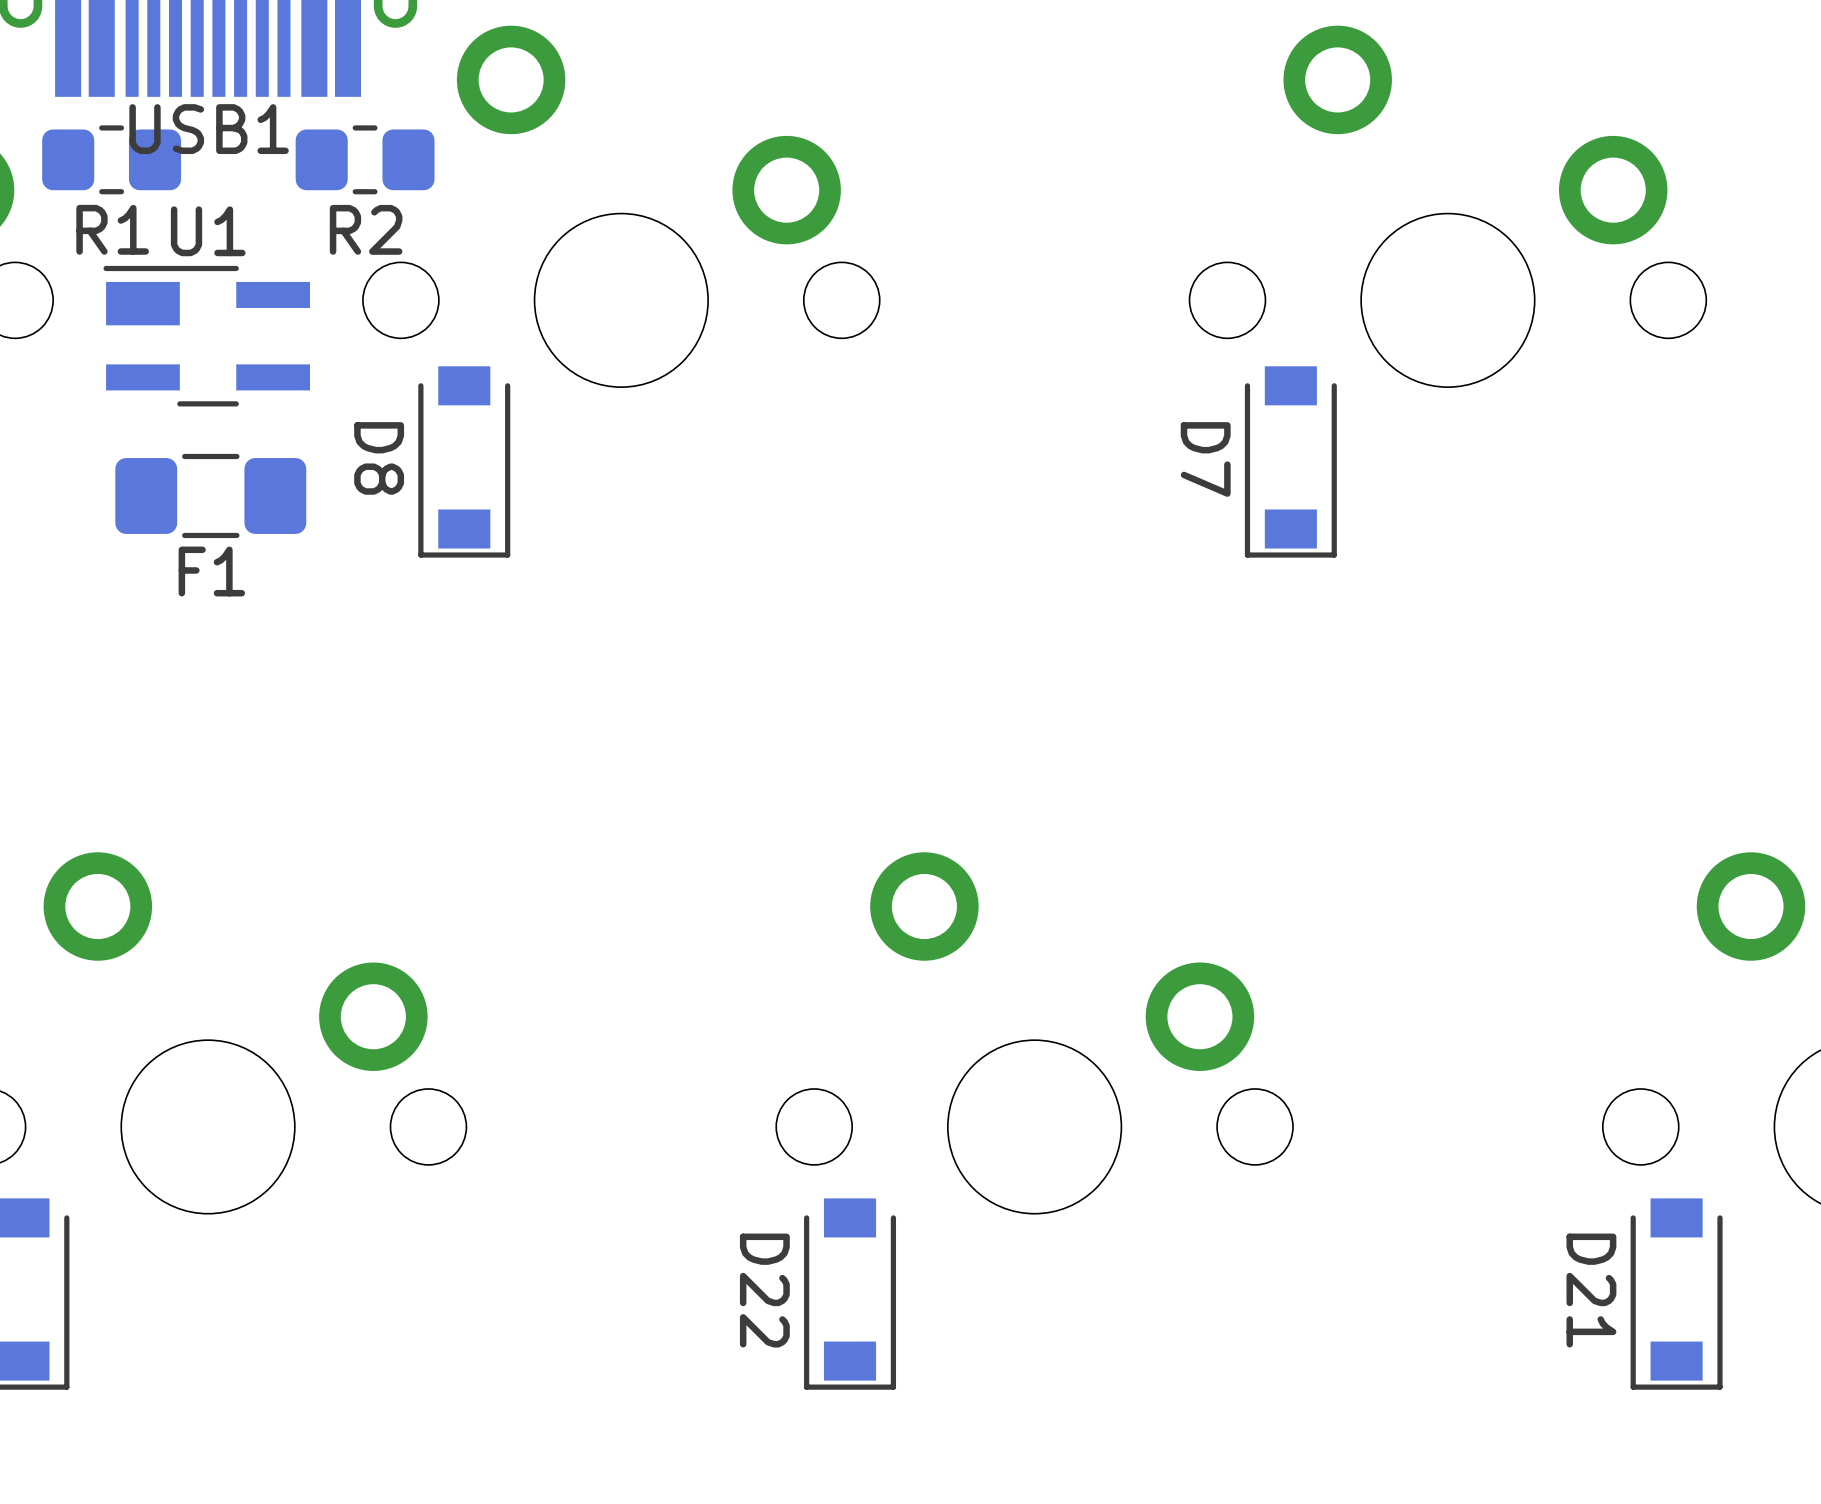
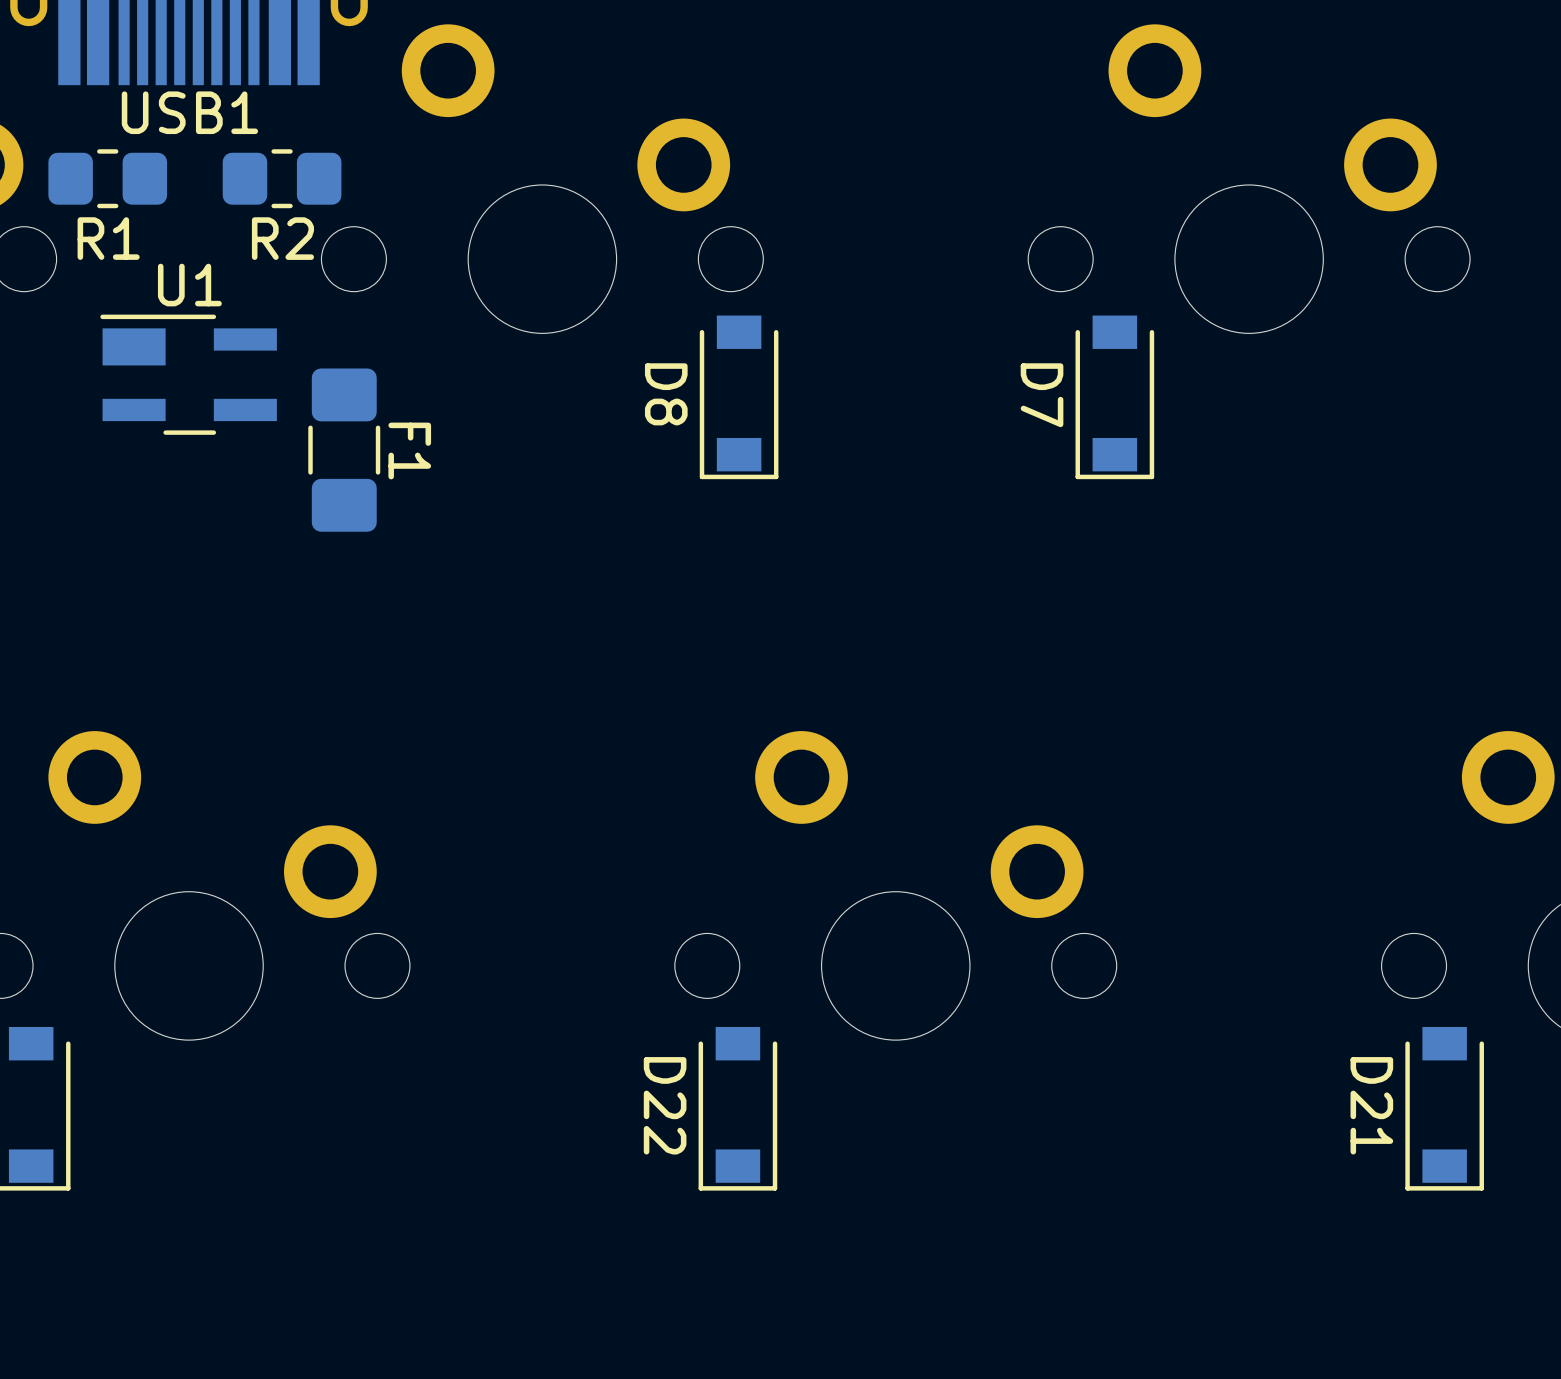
R1 position: (111, 159) -> (107, 178)
R2 position: (365, 159) -> (282, 178)
U1 position: (206, 336) -> (188, 374)
D8 position: (464, 461) -> (739, 397)
F1 rotation: 0° (210, 495) -> 90° clockwise (344, 450)
F1 position: (210, 495) -> (344, 450)
F1 name position: F1 (211, 571) -> F1 (409, 450)

